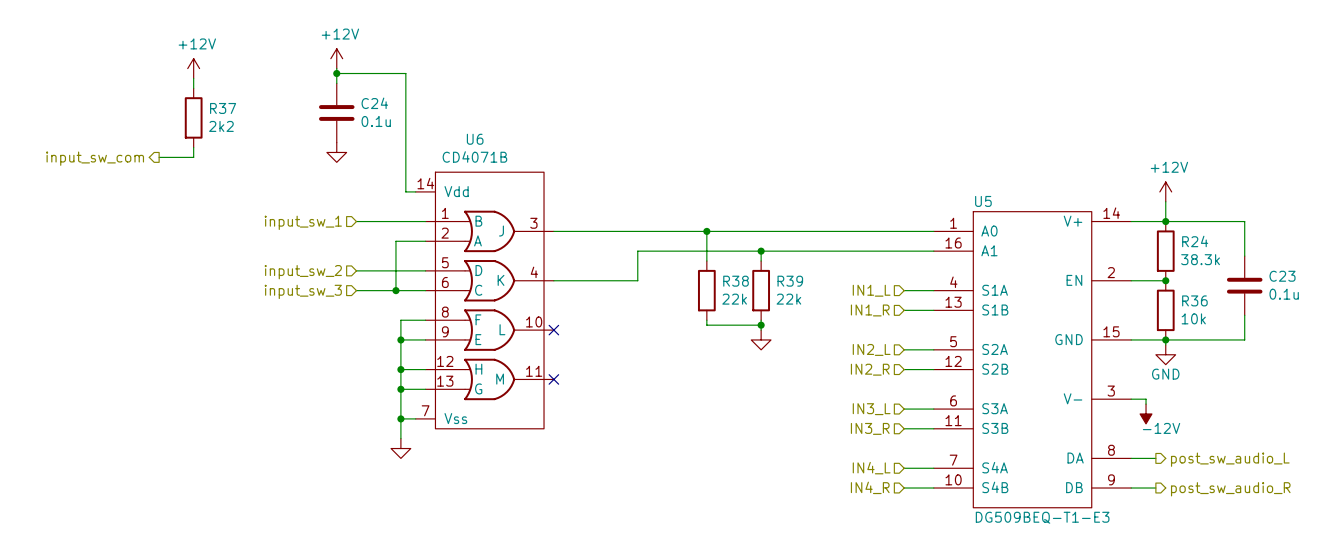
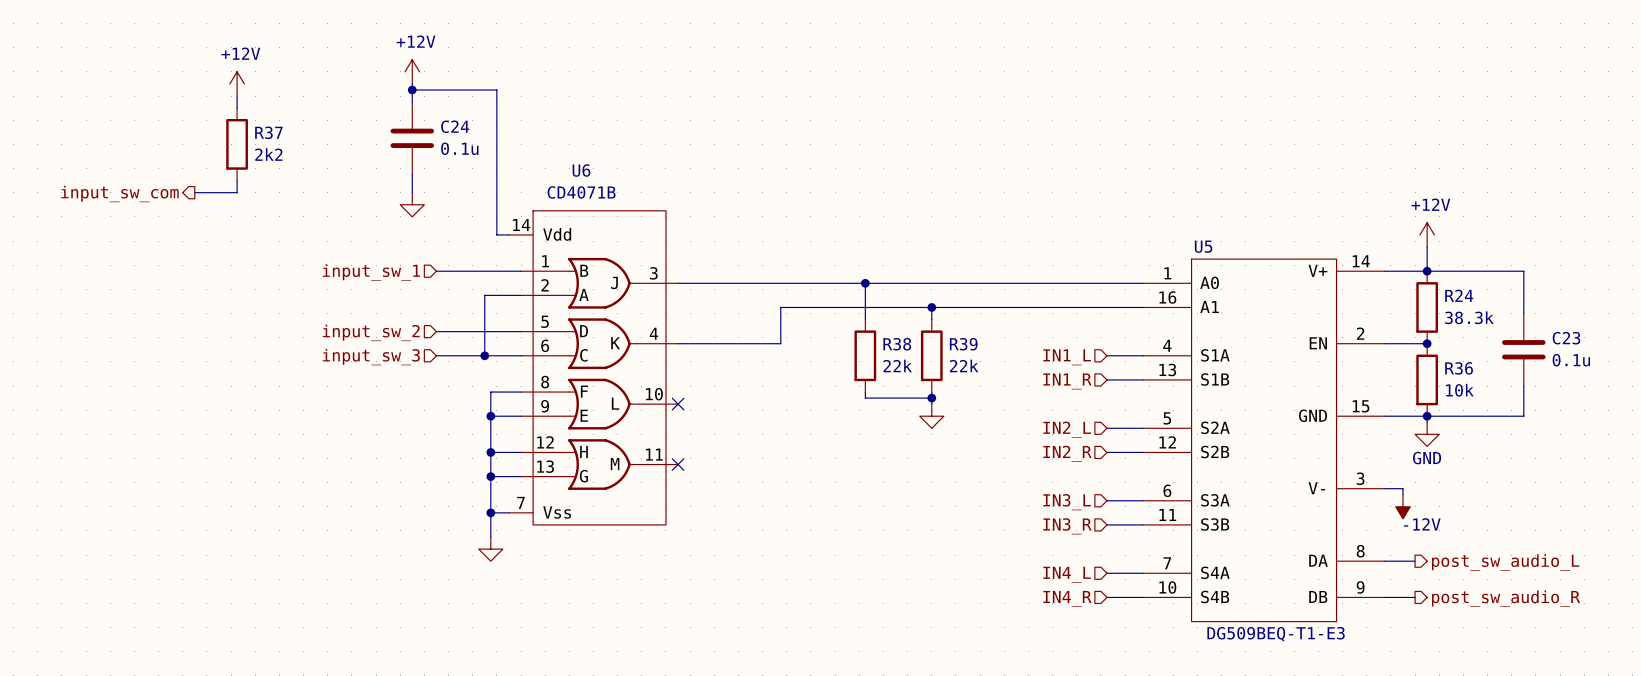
power symbol position: (336, 152) -> (412, 204)

